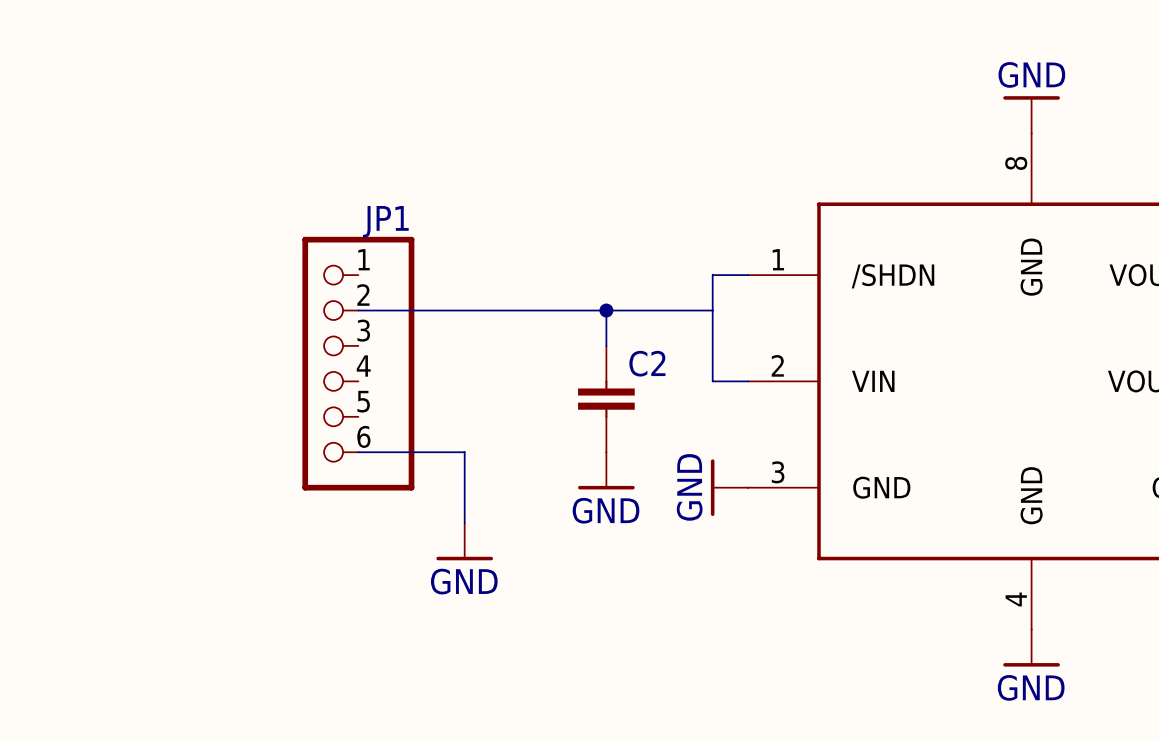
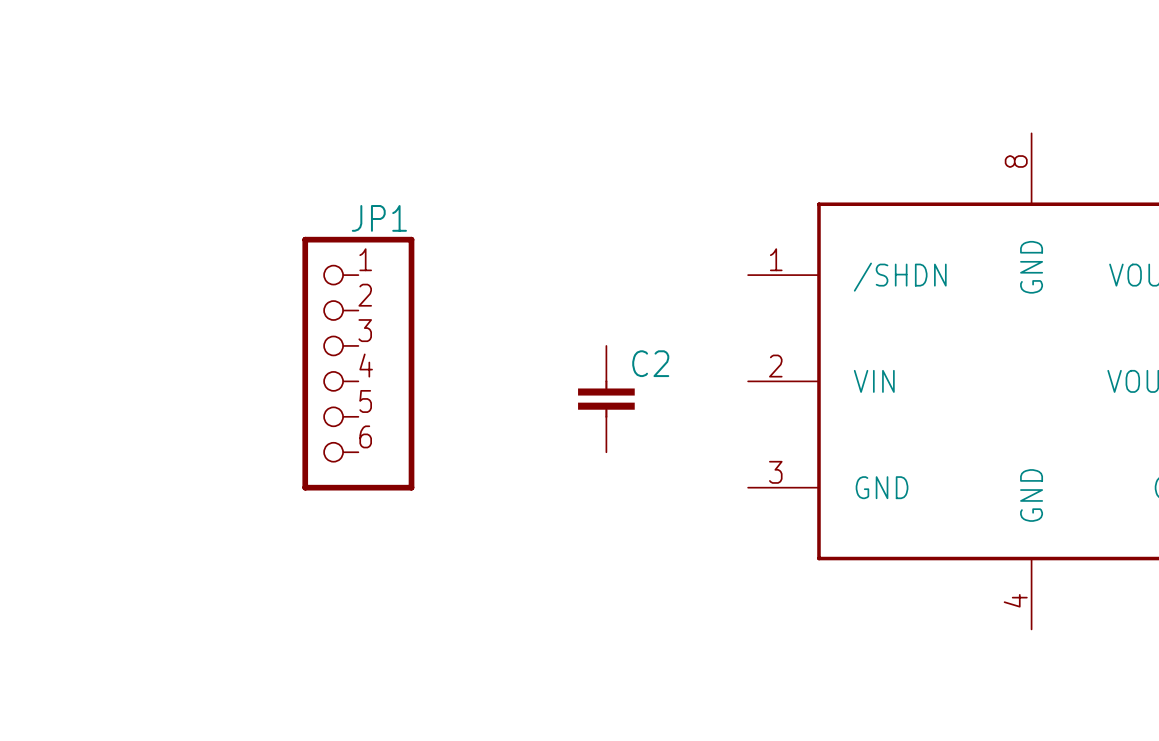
power symbol: GND (1031, 114) -> none
wire: (748, 275) (712, 275) (712, 381) (748, 381) -> none
wire: (358, 310) (712, 310) -> none
wire: (606, 310) (606, 345) -> none
junction: (606, 310) -> none
wire: (358, 452) (464, 452) (464, 523) -> none
power symbol: GND (606, 470) -> none
power symbol: GND (729, 487) -> none
power symbol: GND (464, 541) -> none
power symbol: GND (1031, 648) -> none

